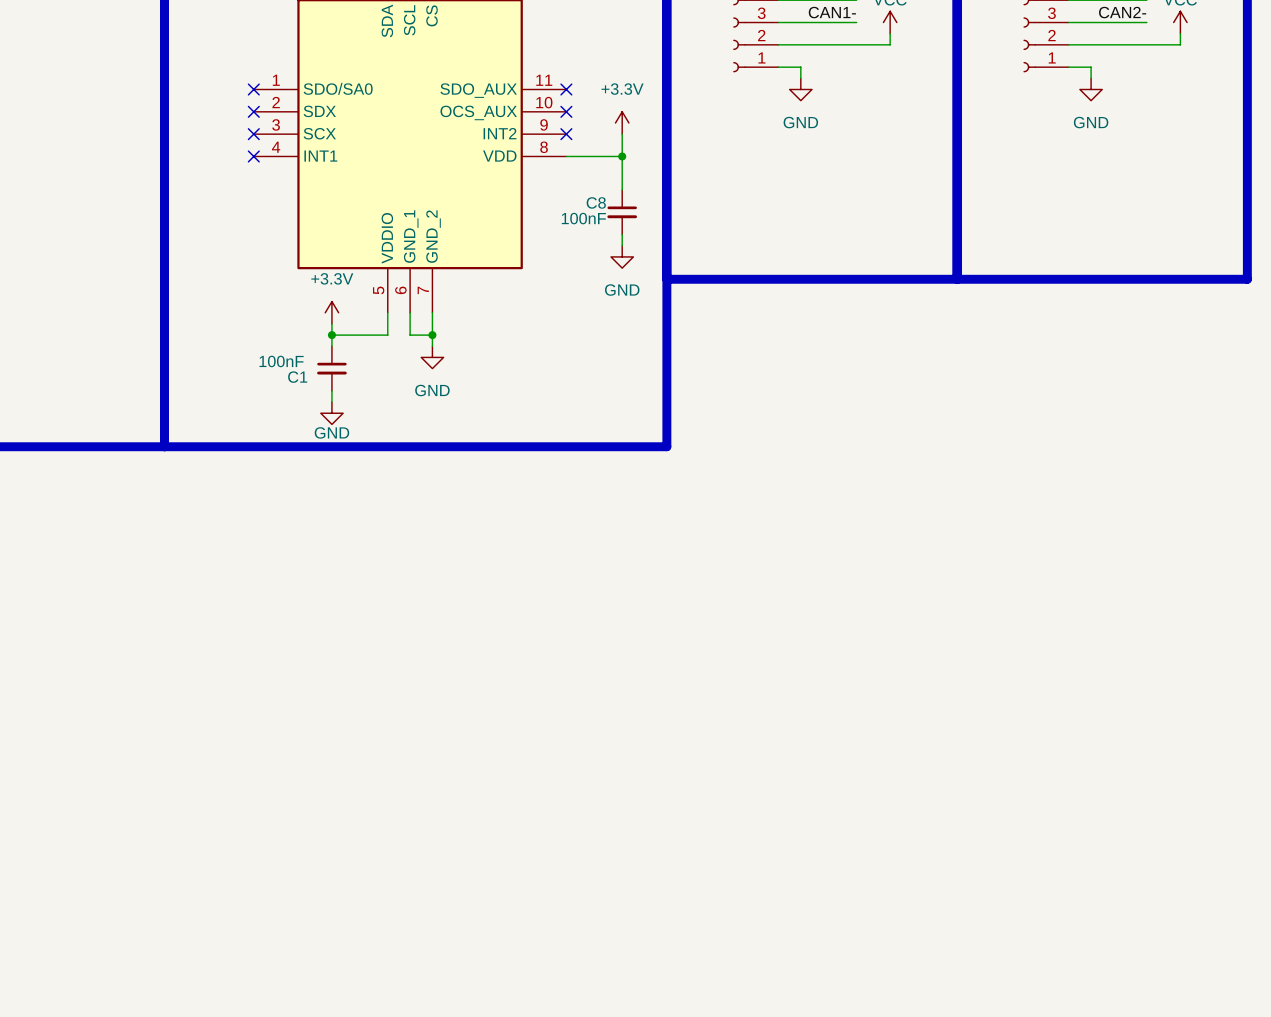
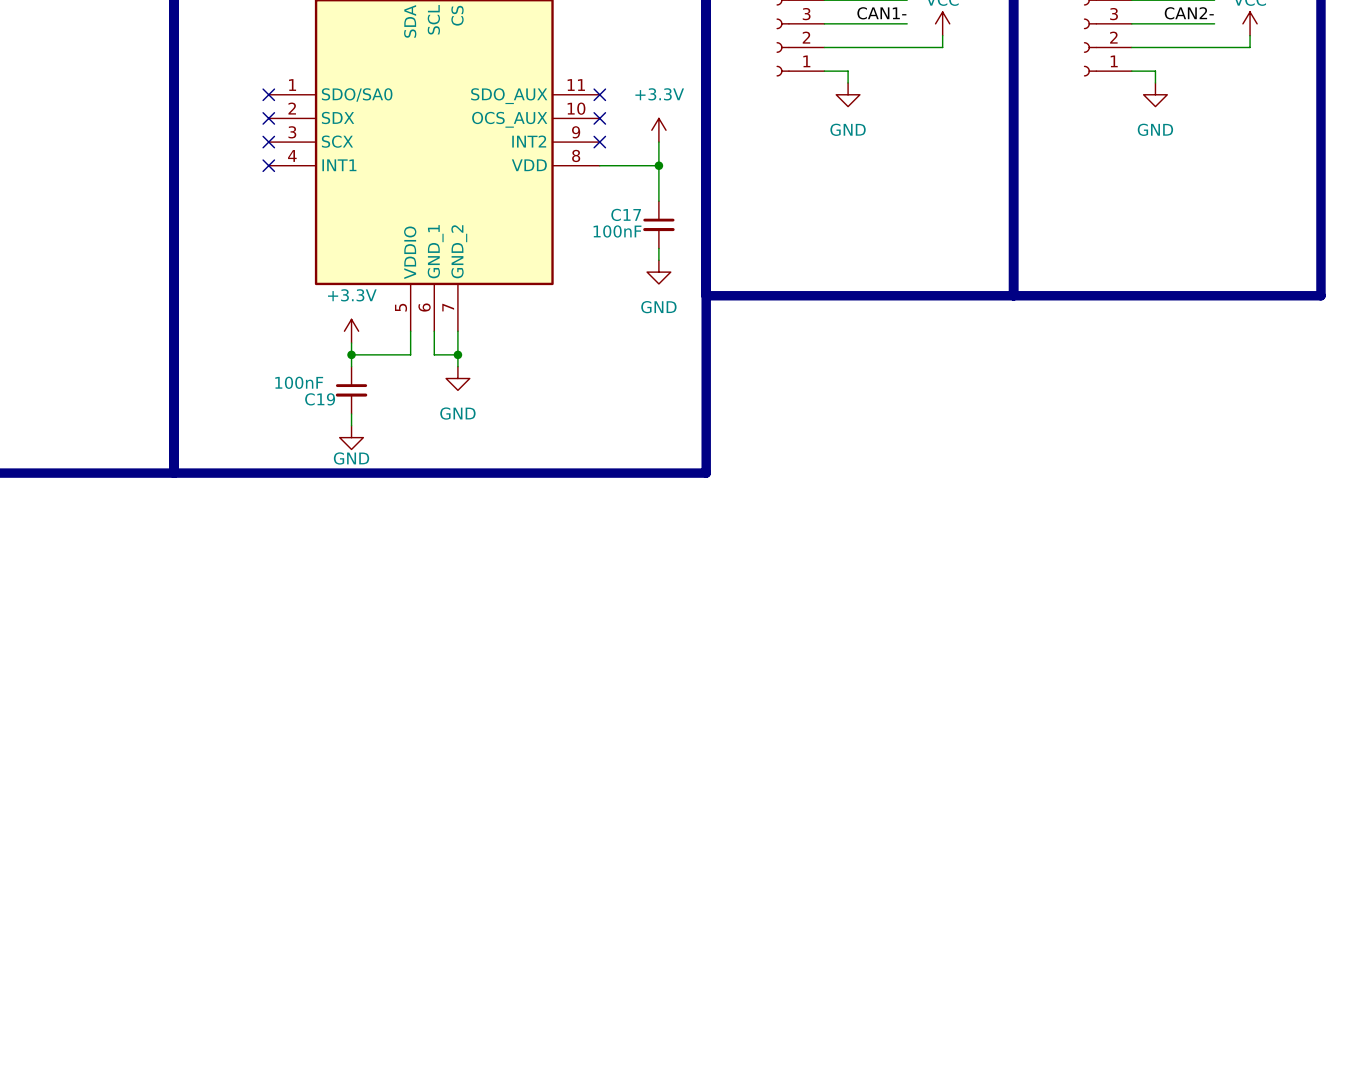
C8 name: C8 (596, 202) -> C17 (626, 214)
C1 name: C1 (297, 377) -> C19 (320, 399)

